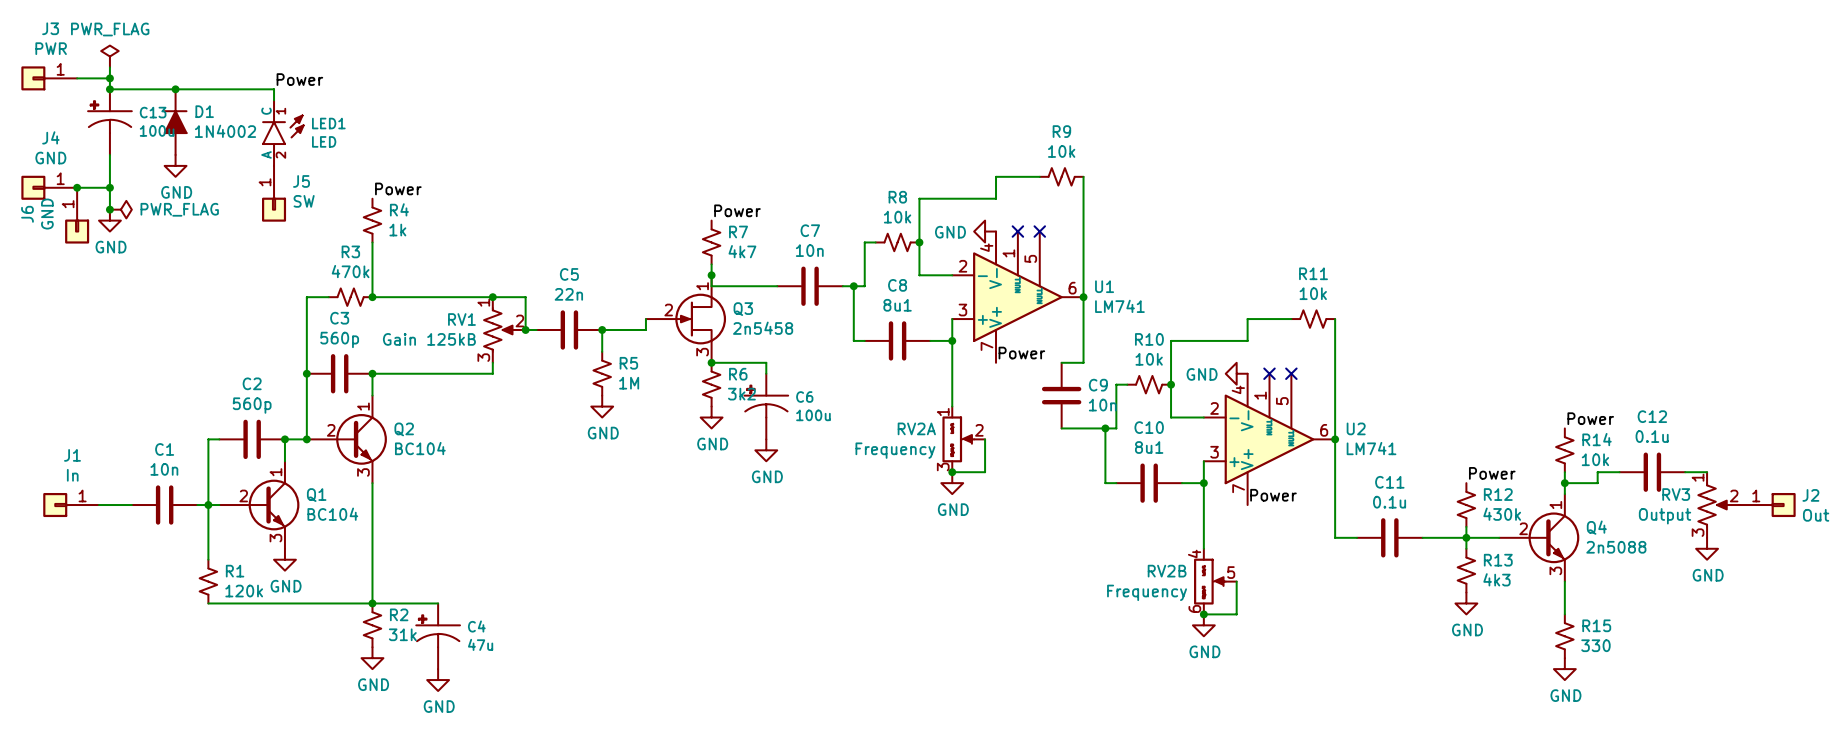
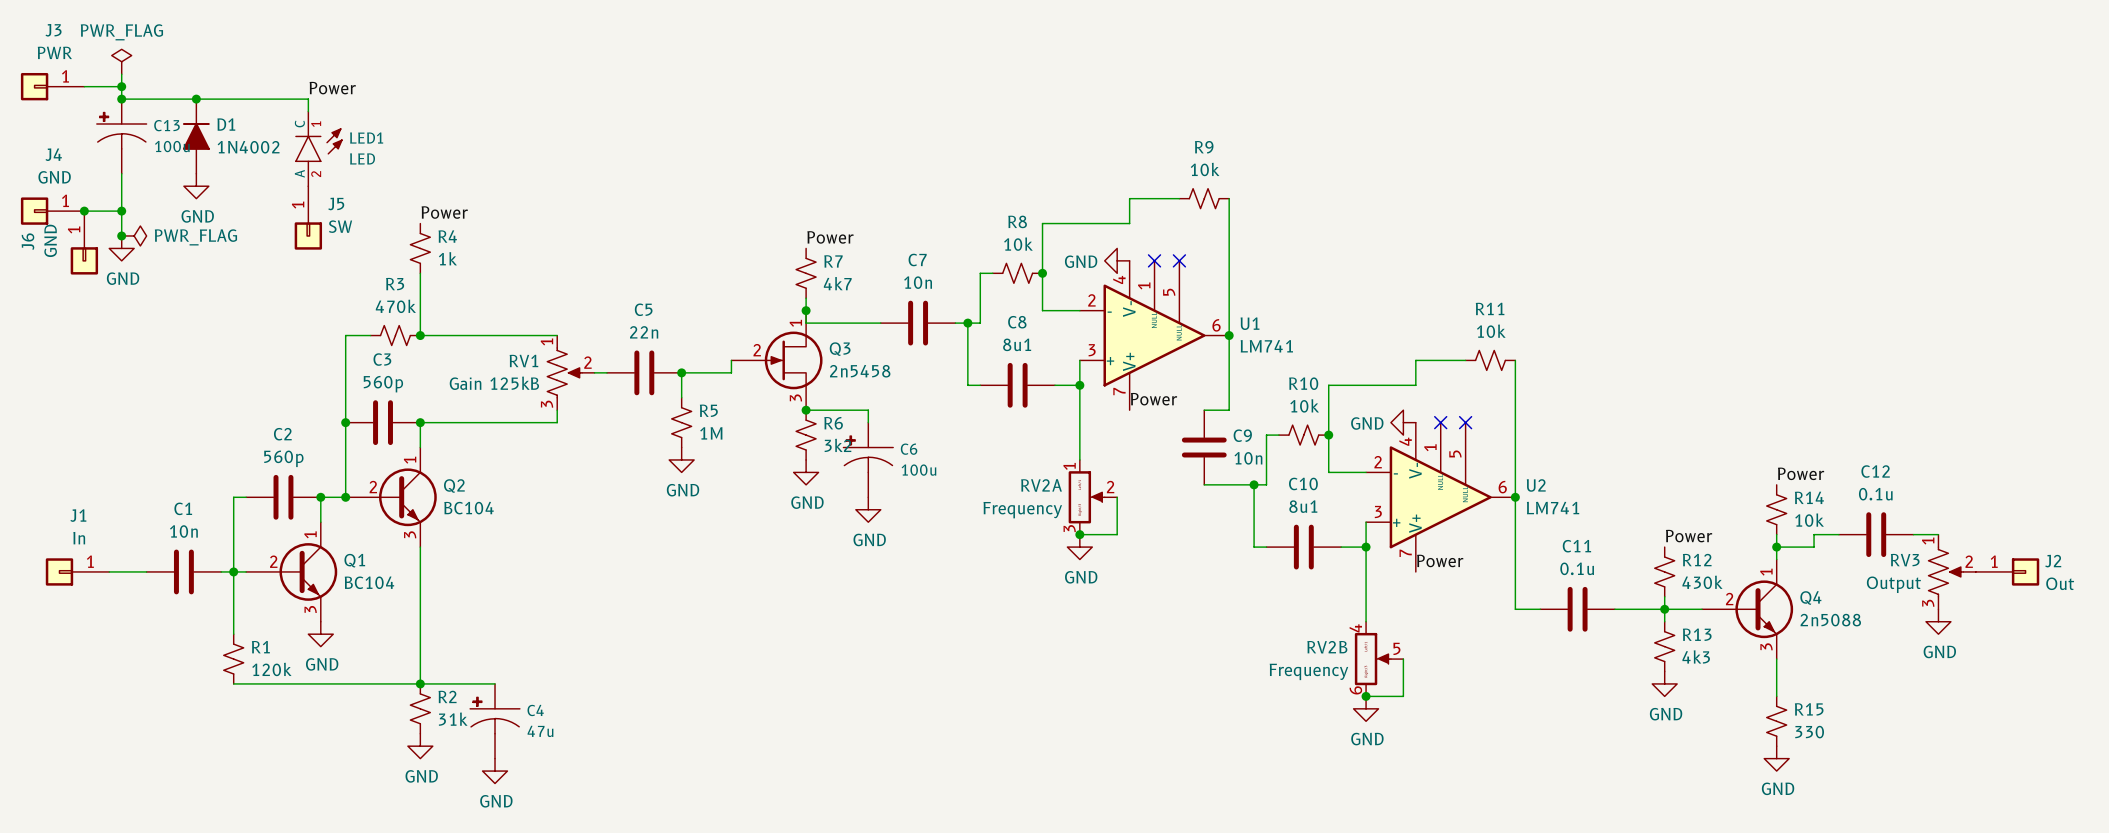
wire: (492, 297) (525, 297) (525, 329) -> none
junction: (492, 297) -> none
junction: (525, 329) -> none

